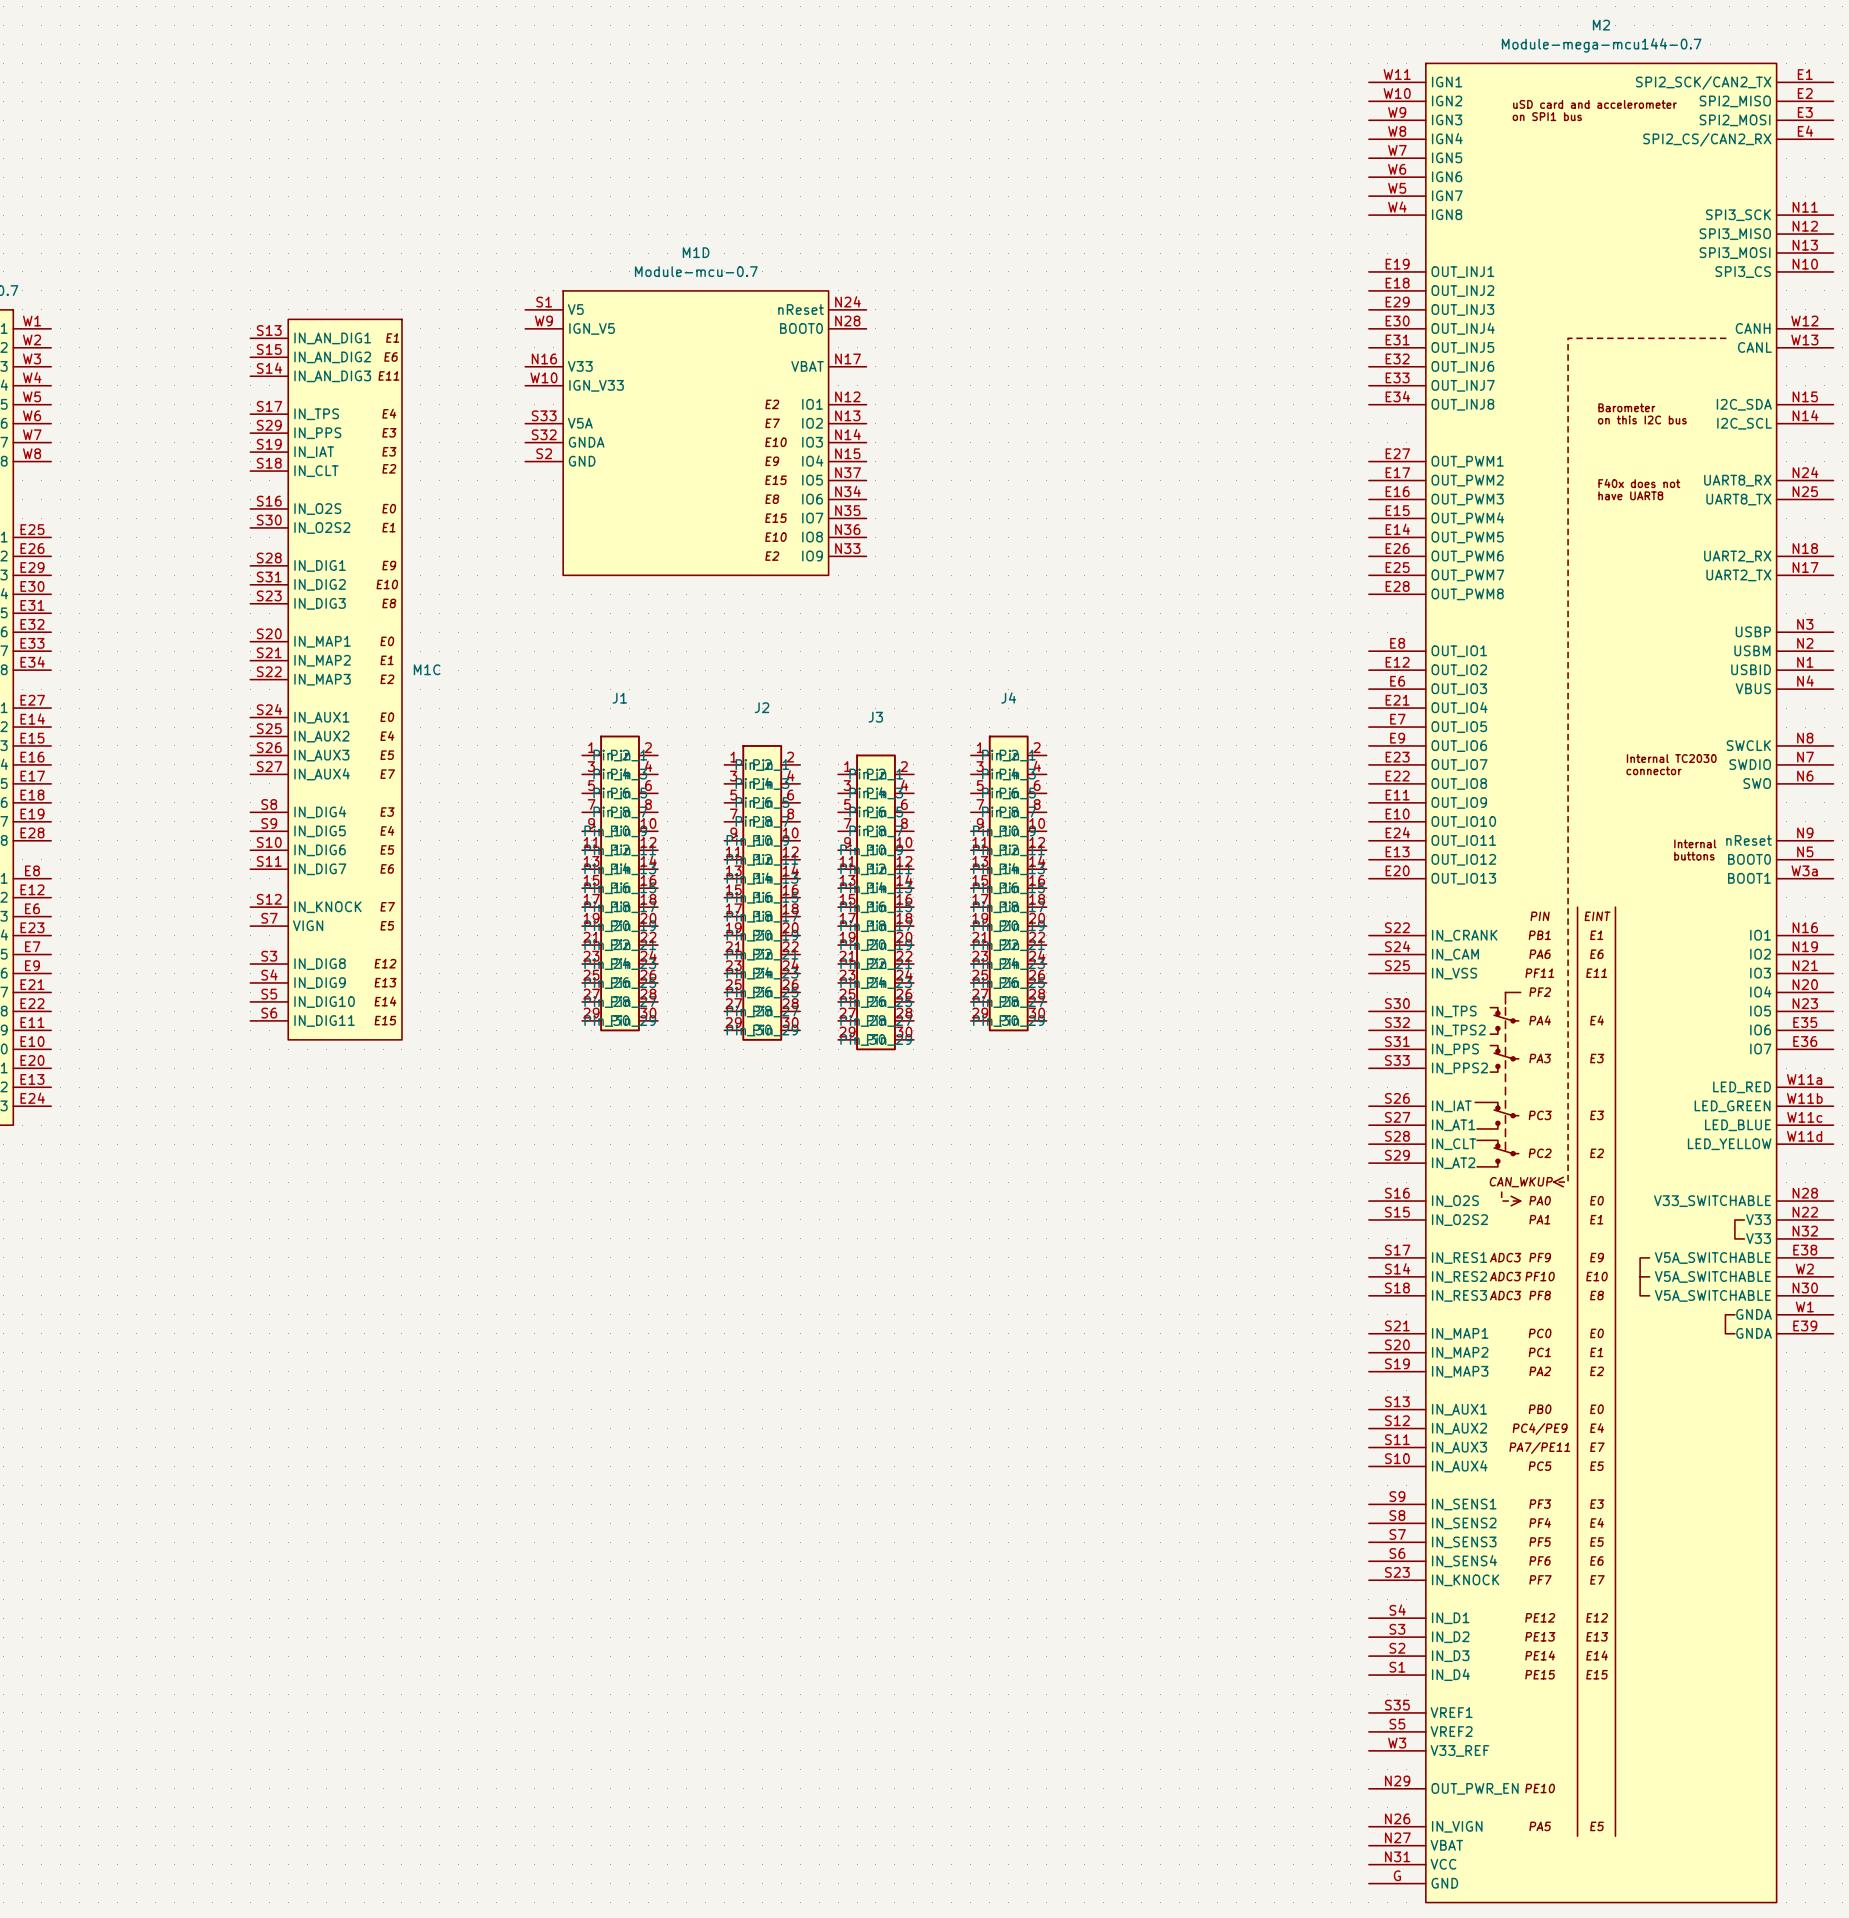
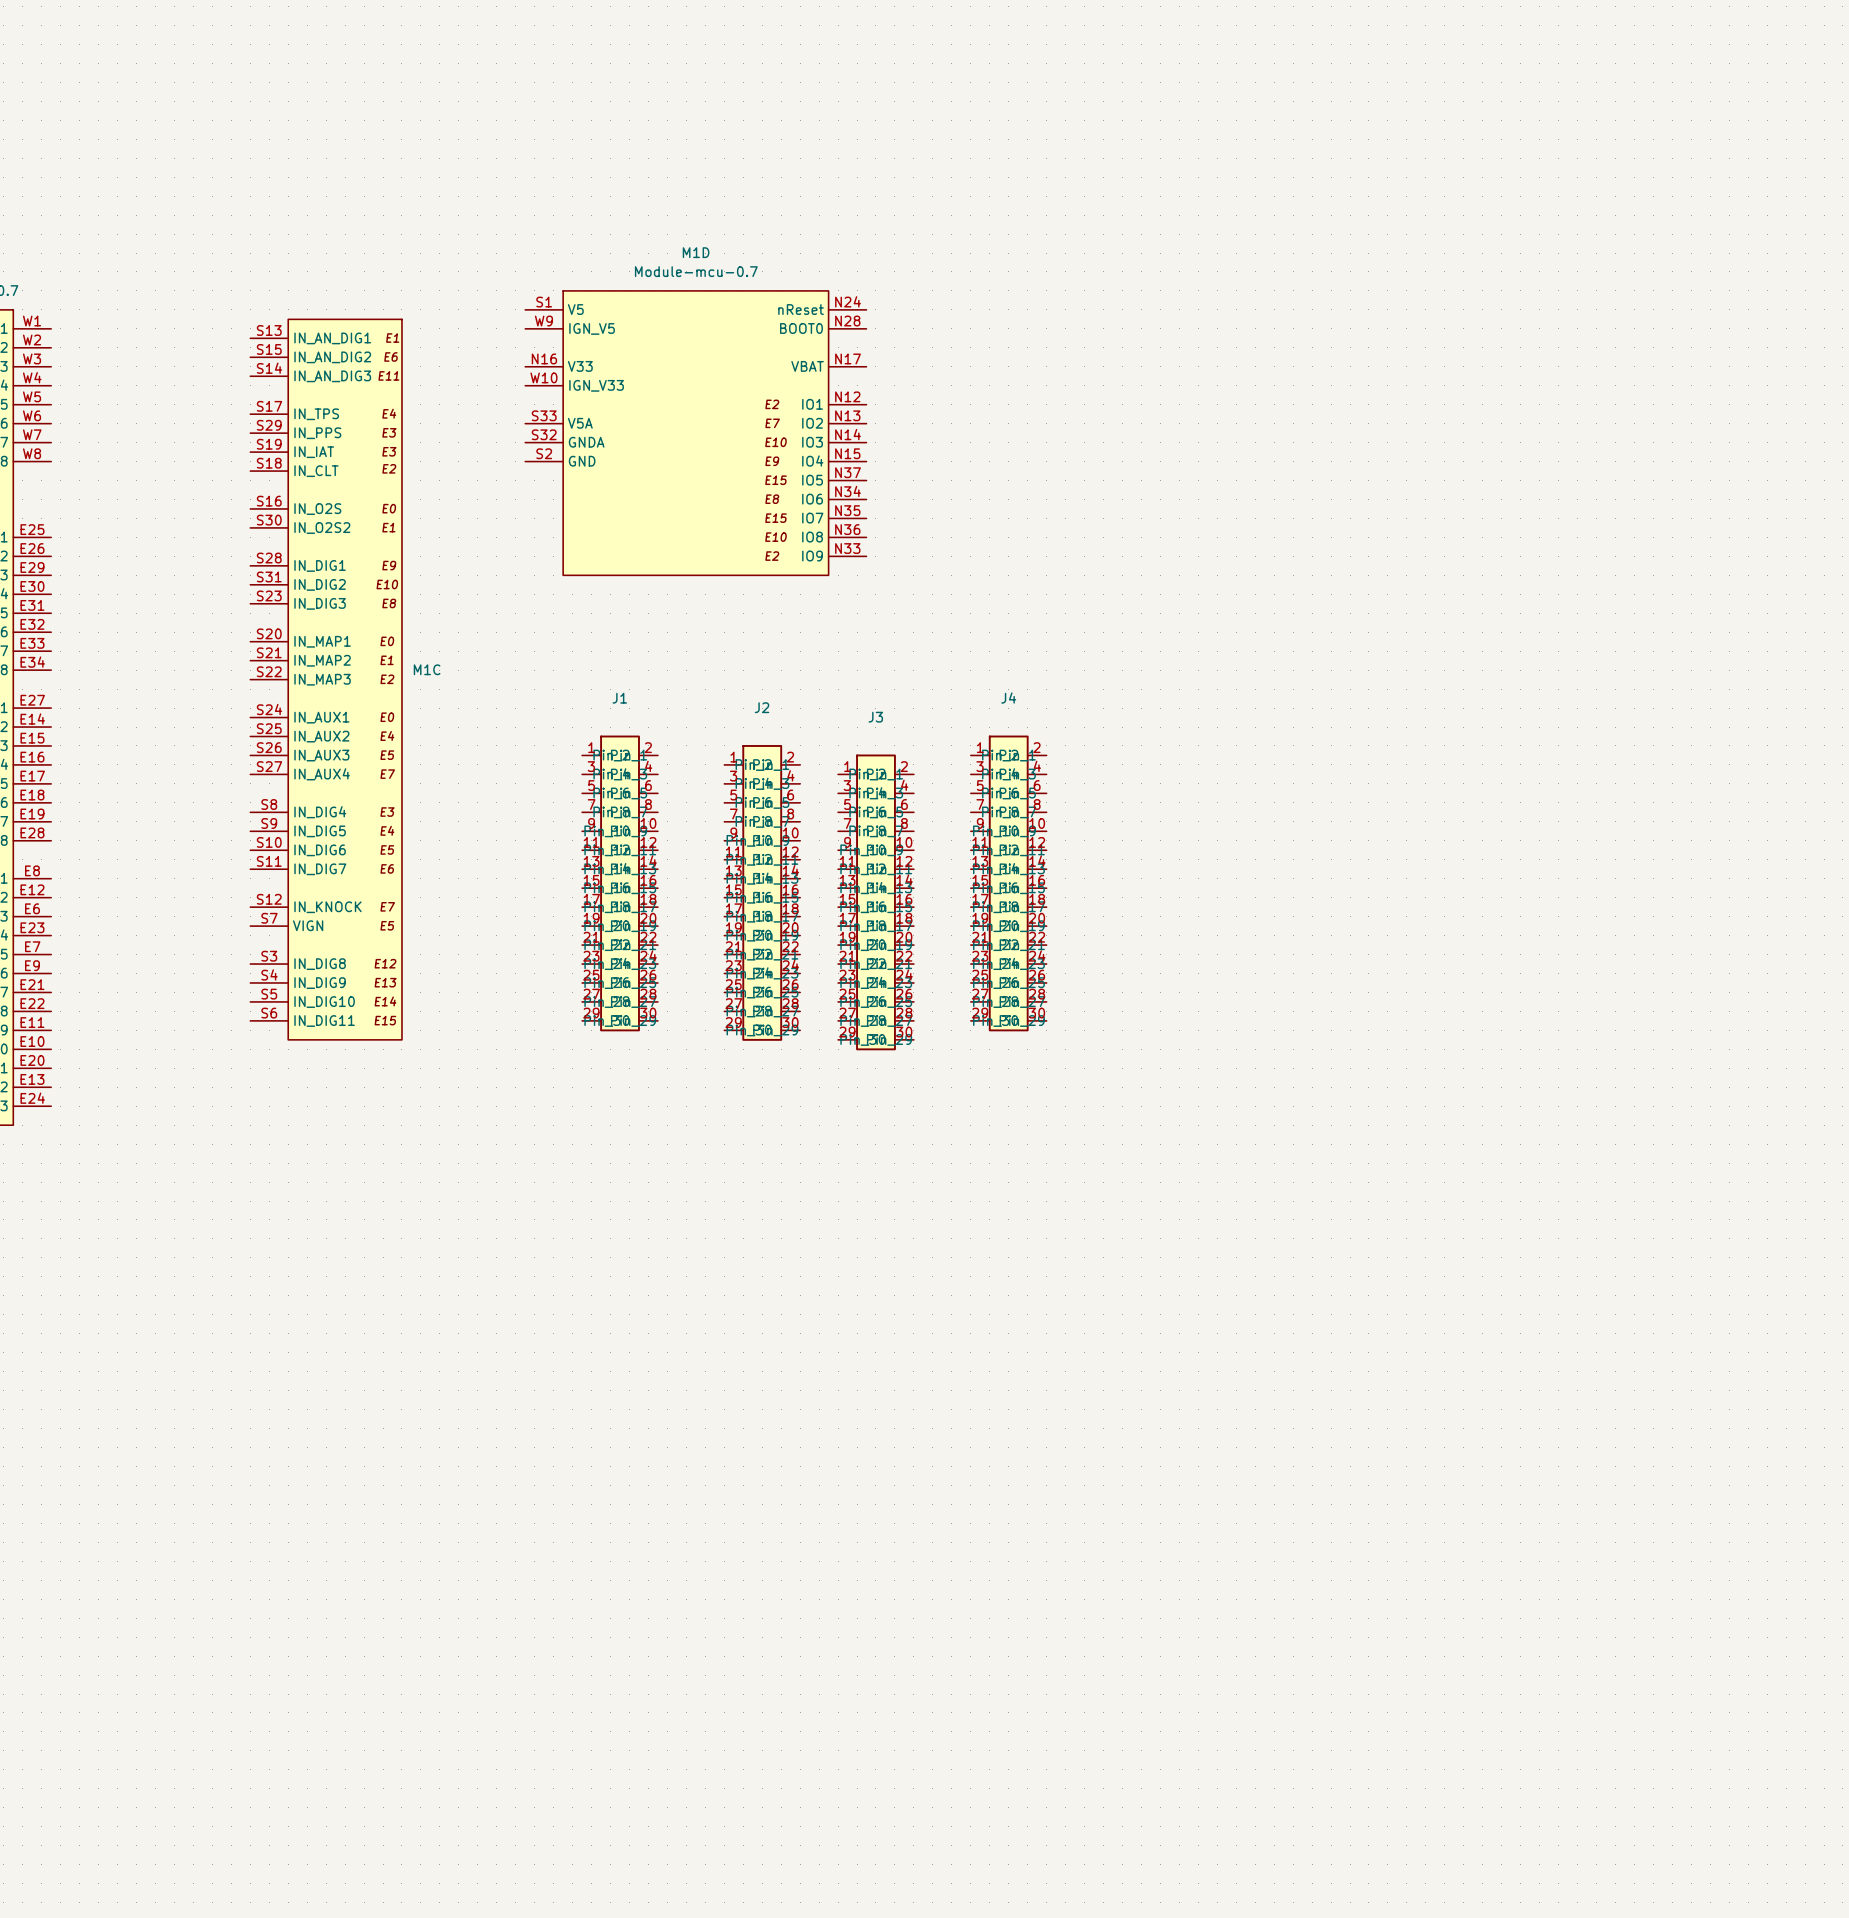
M2: Module-mega-mcu144-0.7 (1601, 982) -> none

